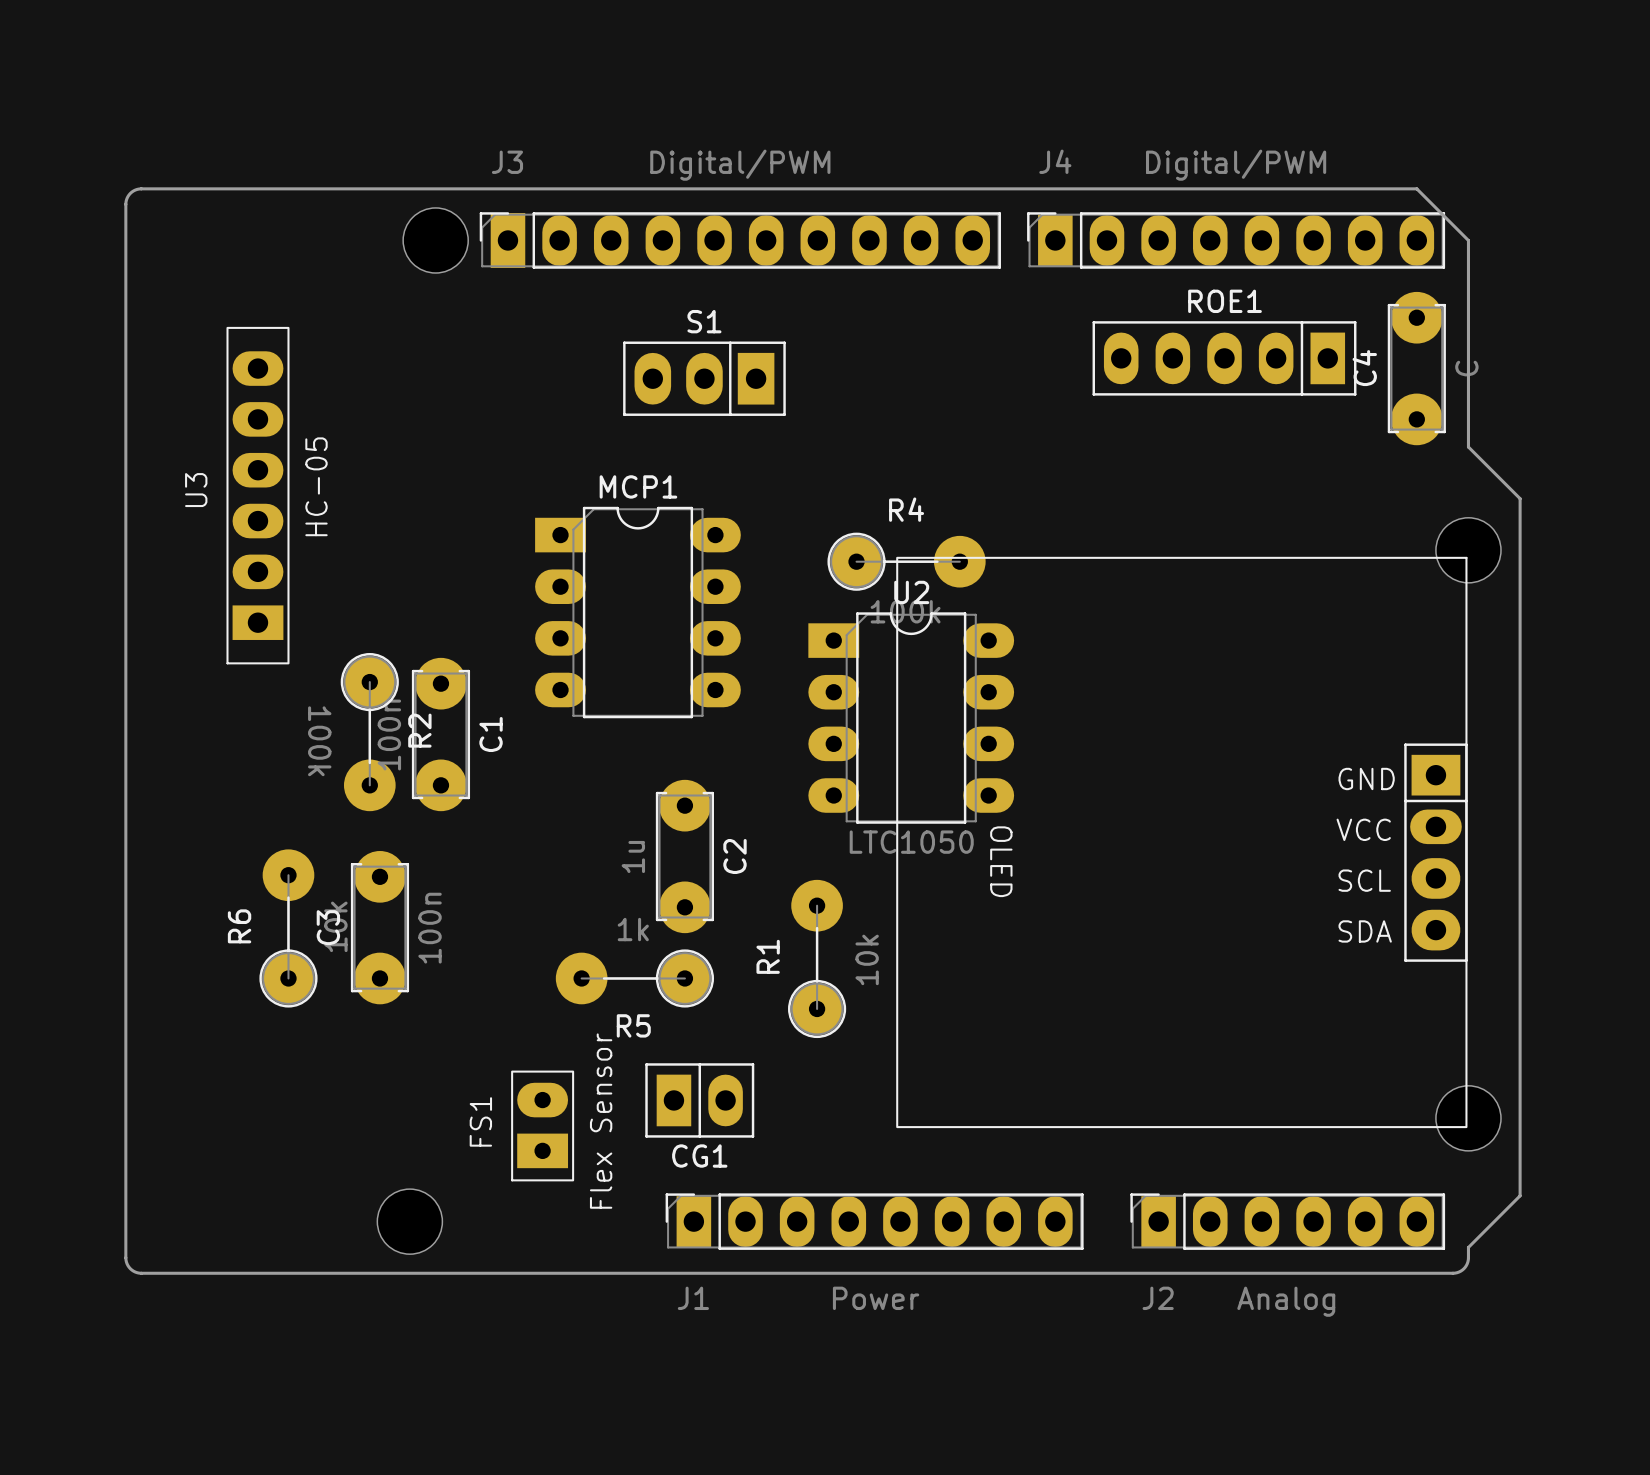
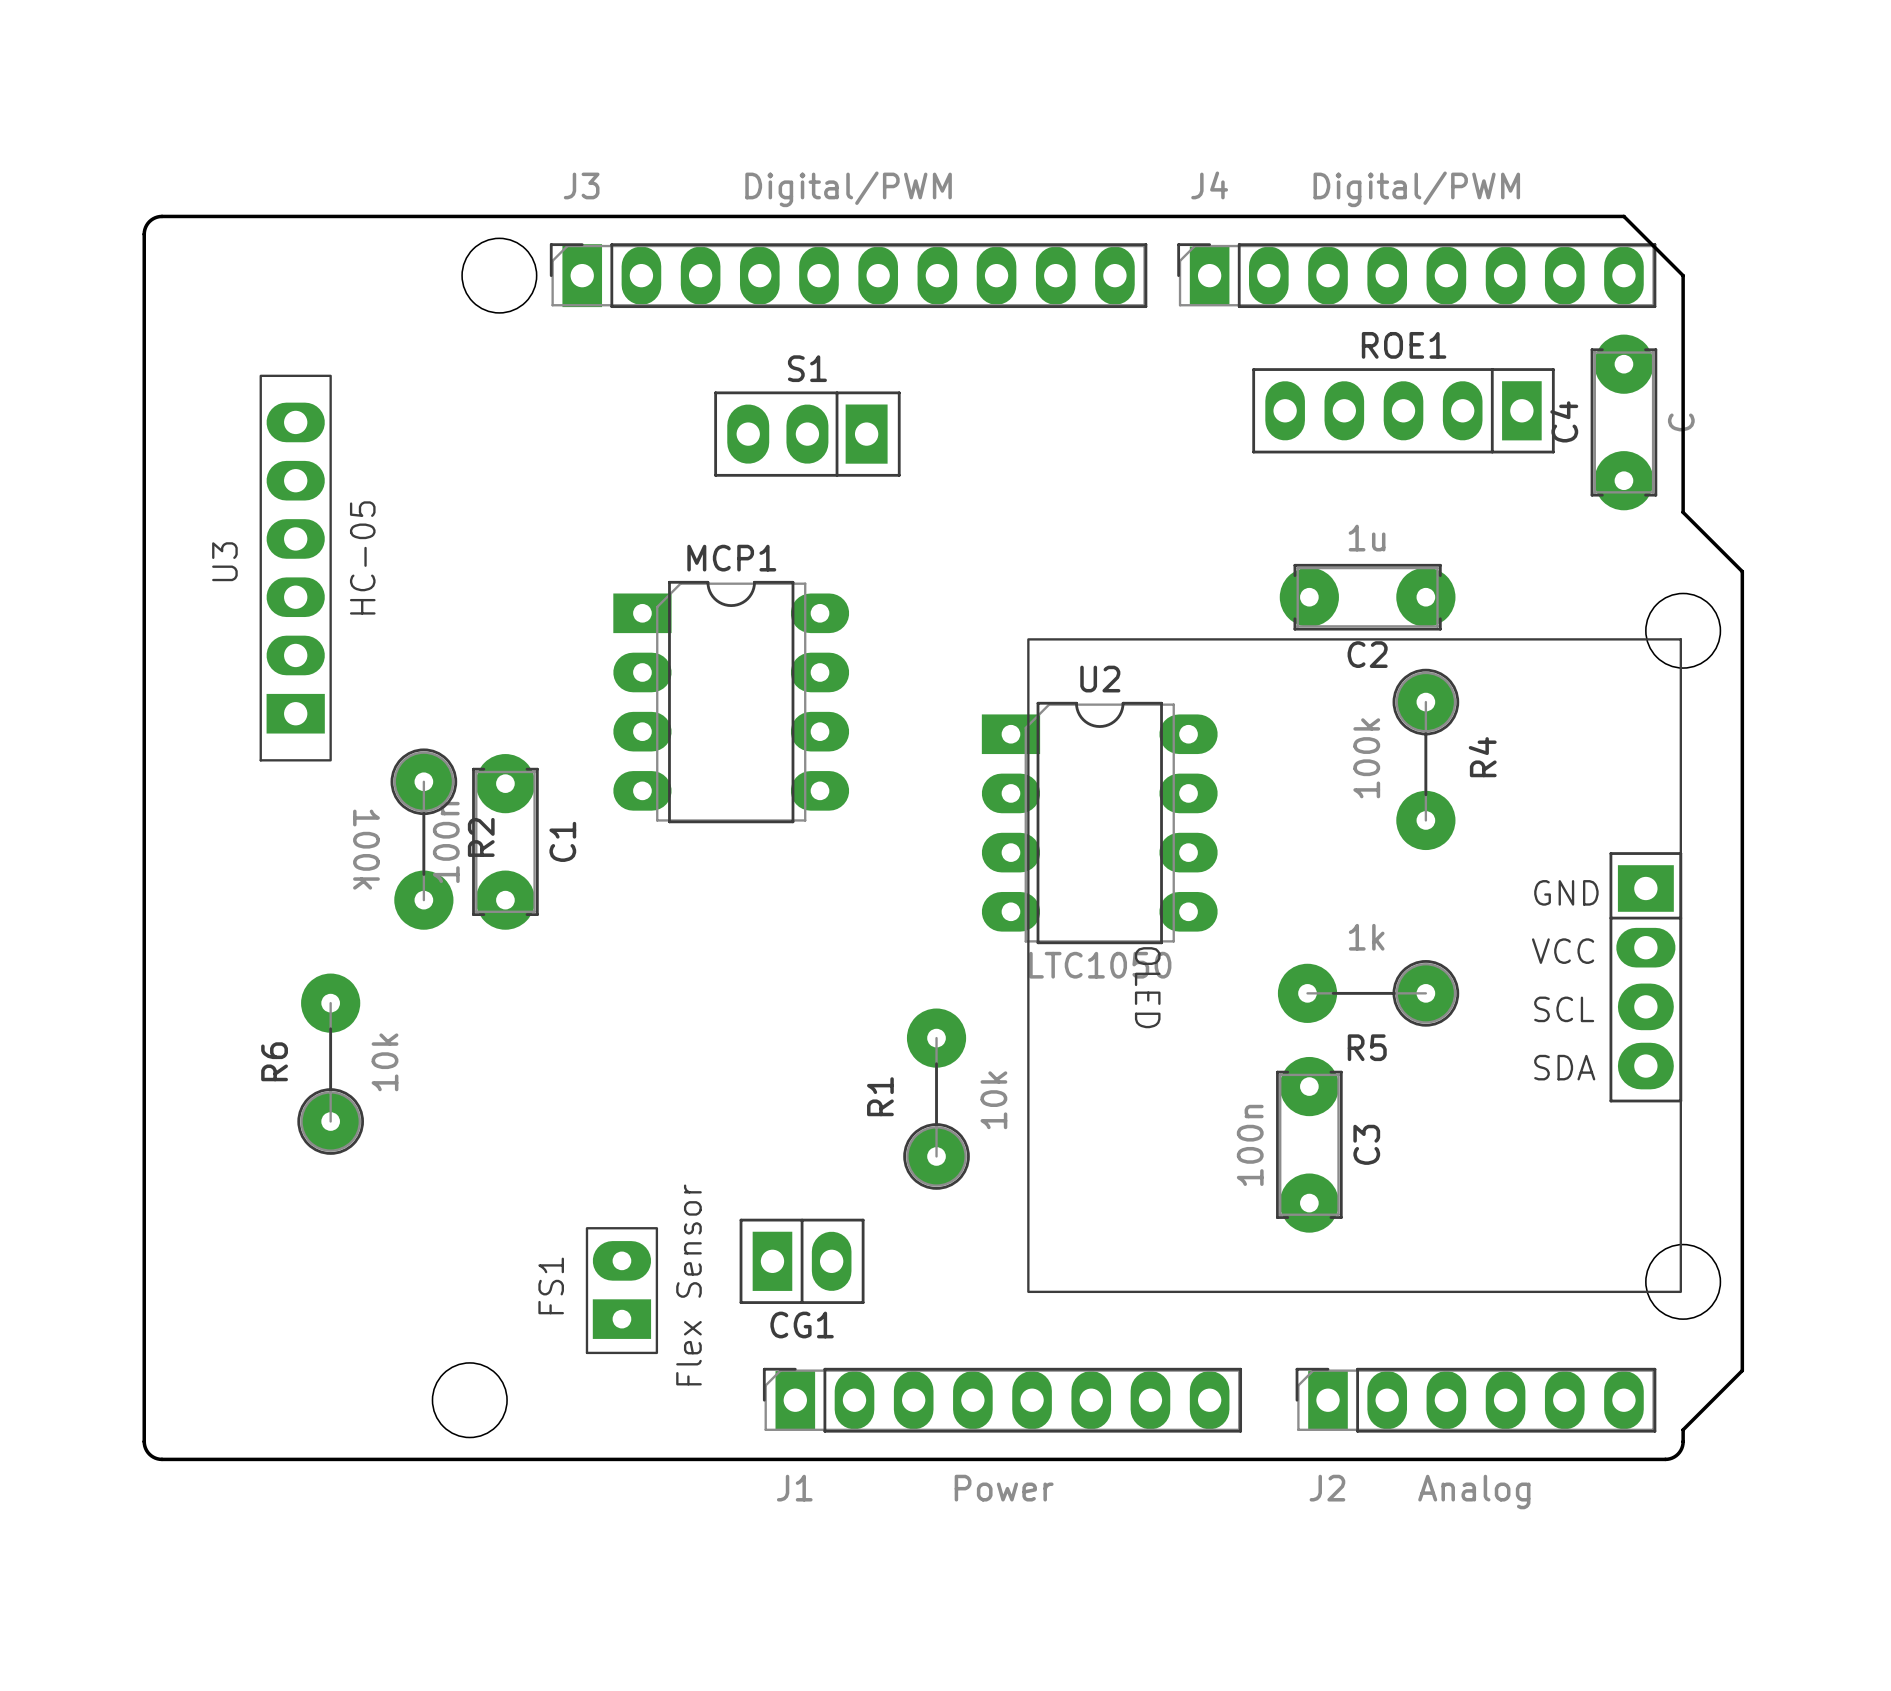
R4 rotation: 0° (906, 561) -> 90° clockwise (1425, 759)
R4 position: (906, 561) -> (1425, 759)
U2 position: (911, 718) -> (1099, 823)
C2 rotation: 0° (684, 856) -> 90° clockwise (1367, 597)
C2 position: (684, 856) -> (1367, 597)
C3 name position: C3 (328, 927) -> C3 (1366, 1144)
C3 position: (379, 927) -> (1309, 1144)
C3 value position: 100n (430, 928) -> 100n (1250, 1145)
R5 position: (634, 978) -> (1368, 993)

